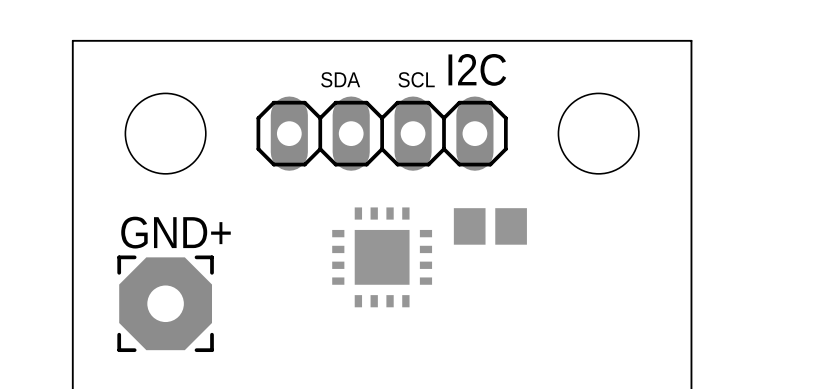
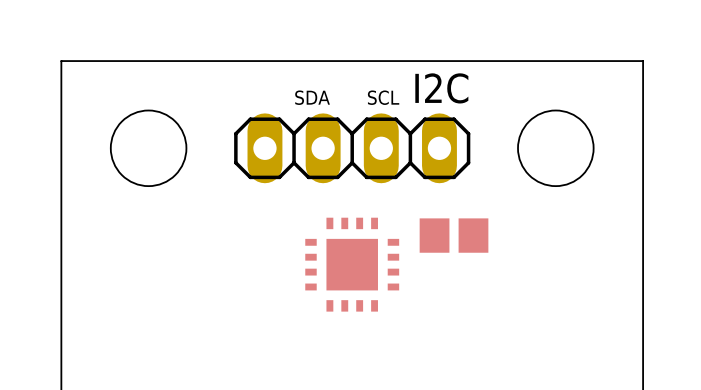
GND+: (165, 303) -> none

